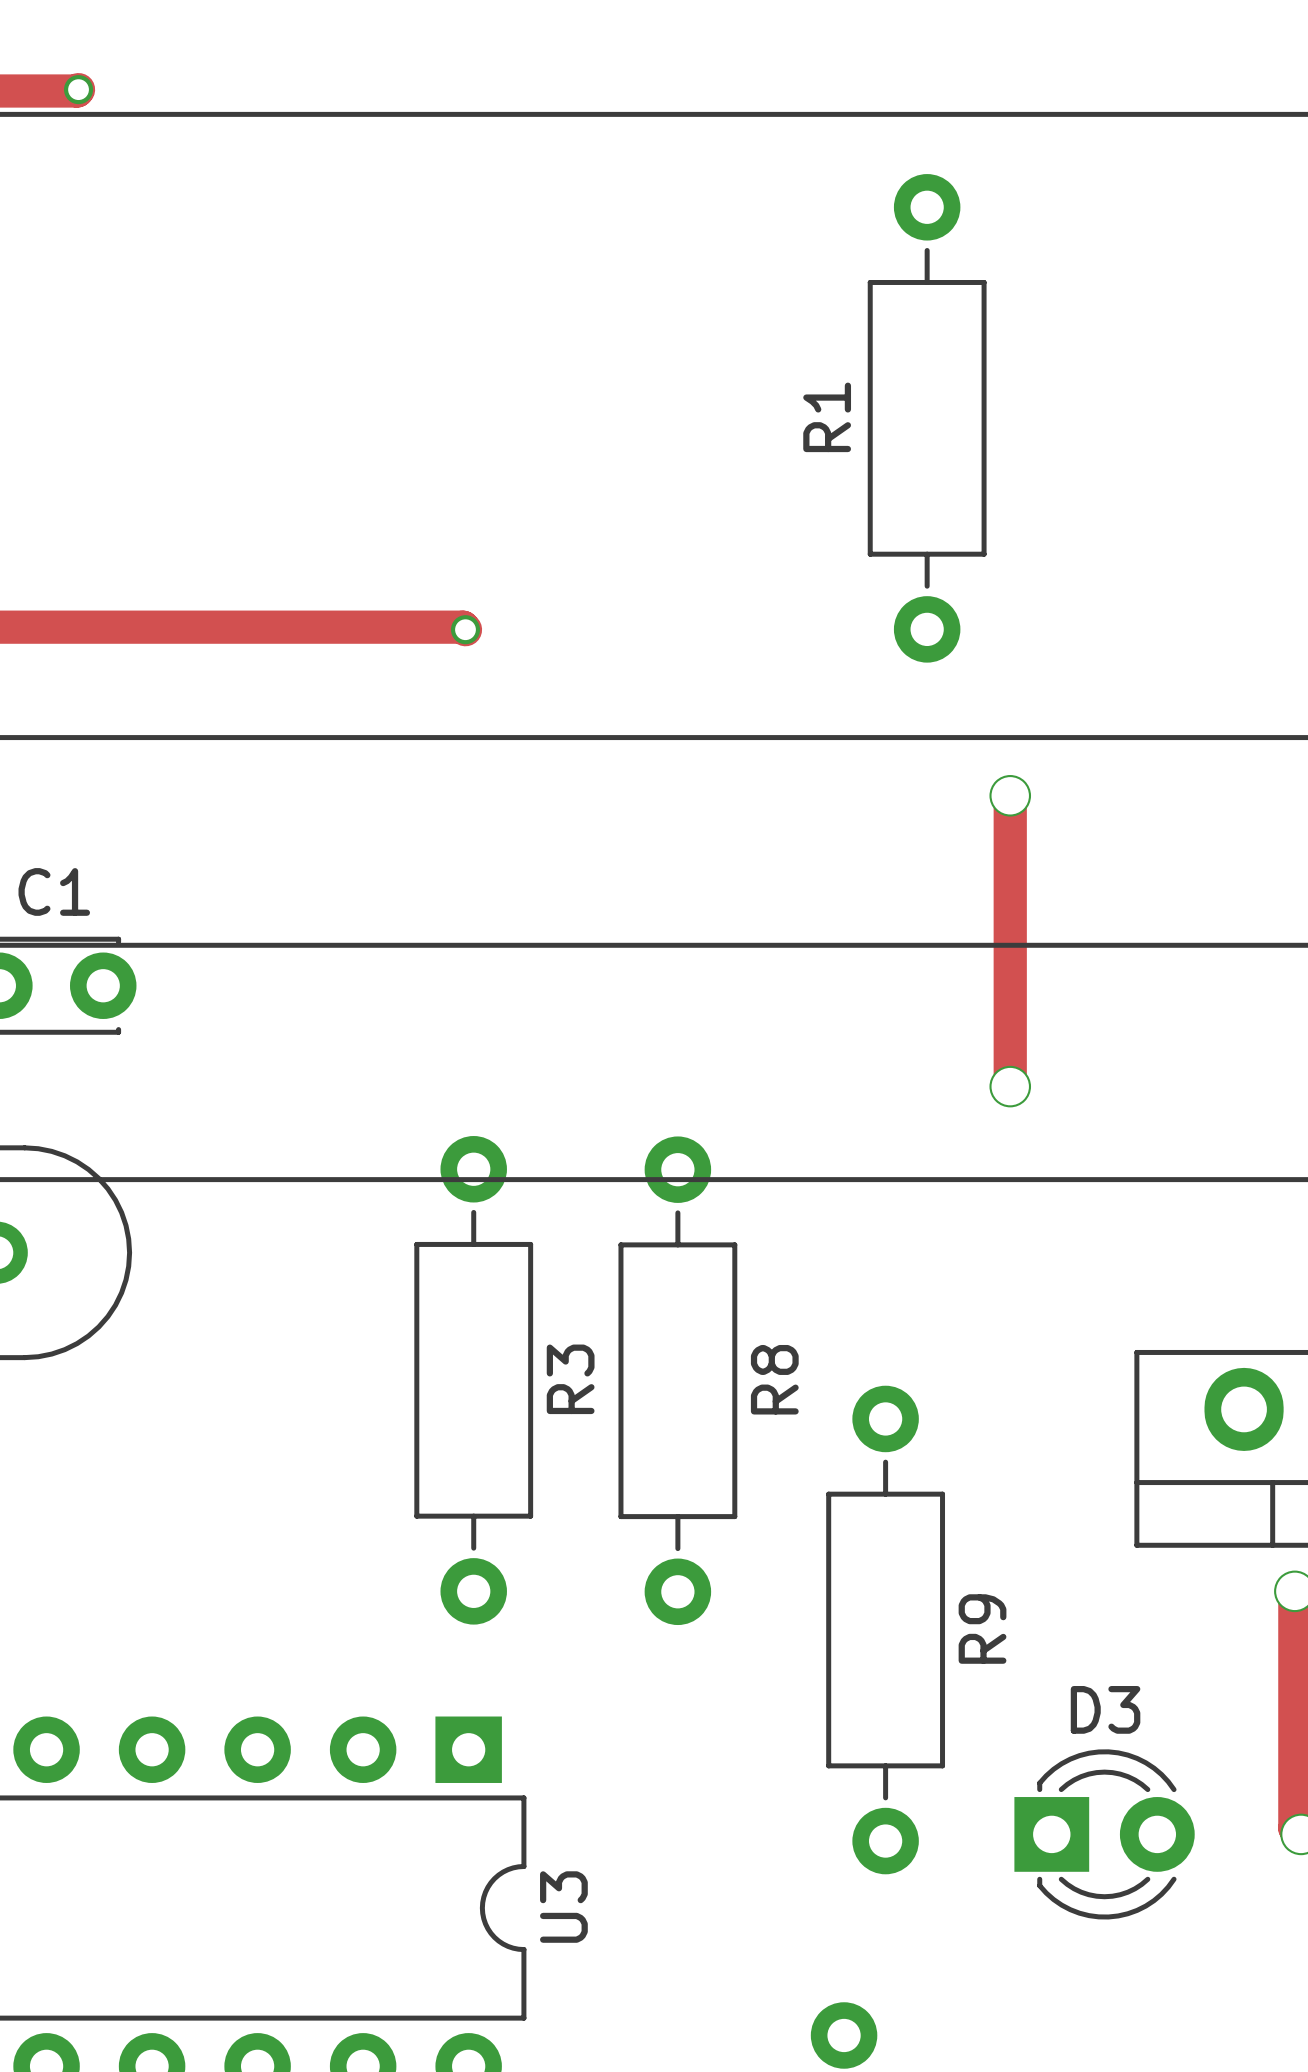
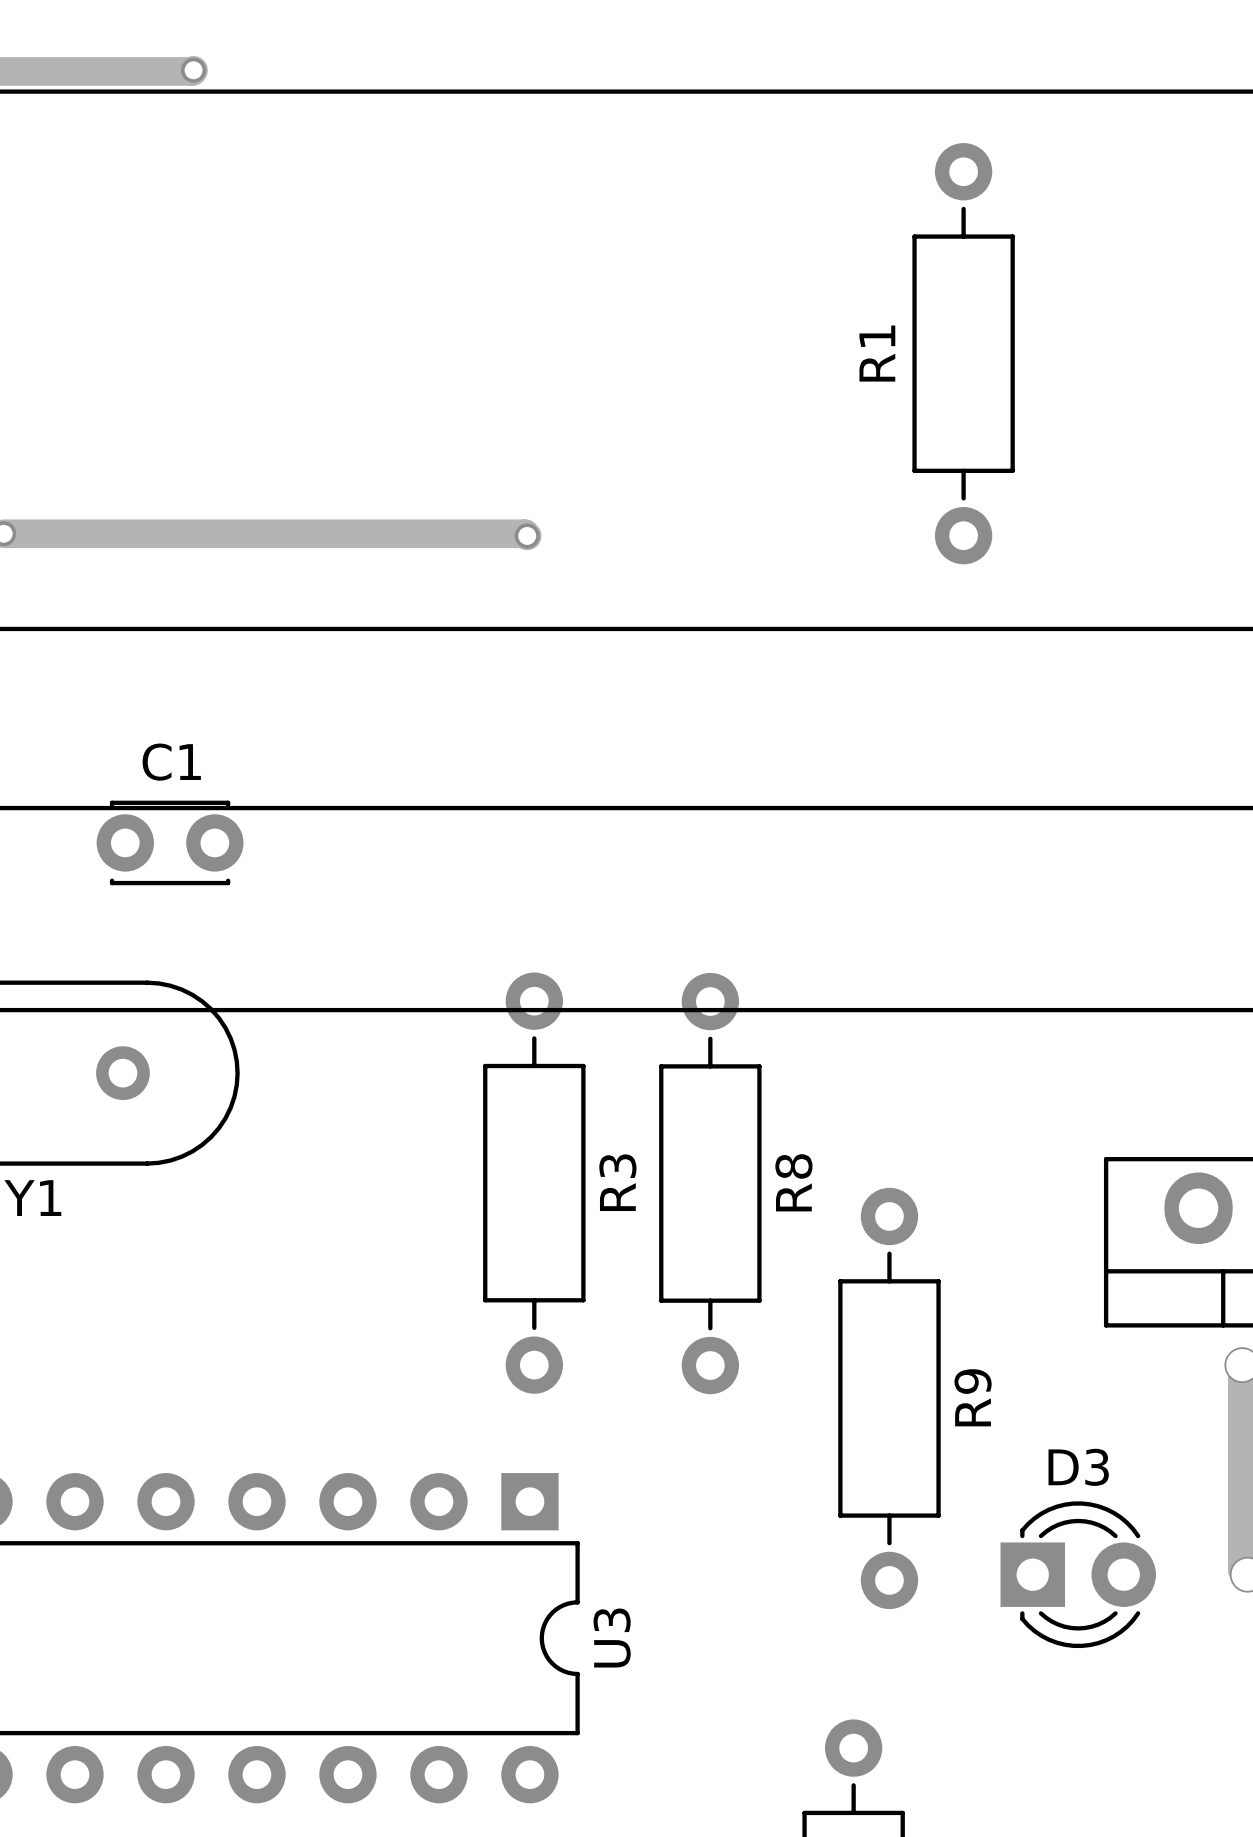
R1 position: (927, 418) -> (963, 353)
track: (1010, 795) (1010, 1086) -> none
via: (1010, 795) -> none
via: (1010, 1086) -> none

